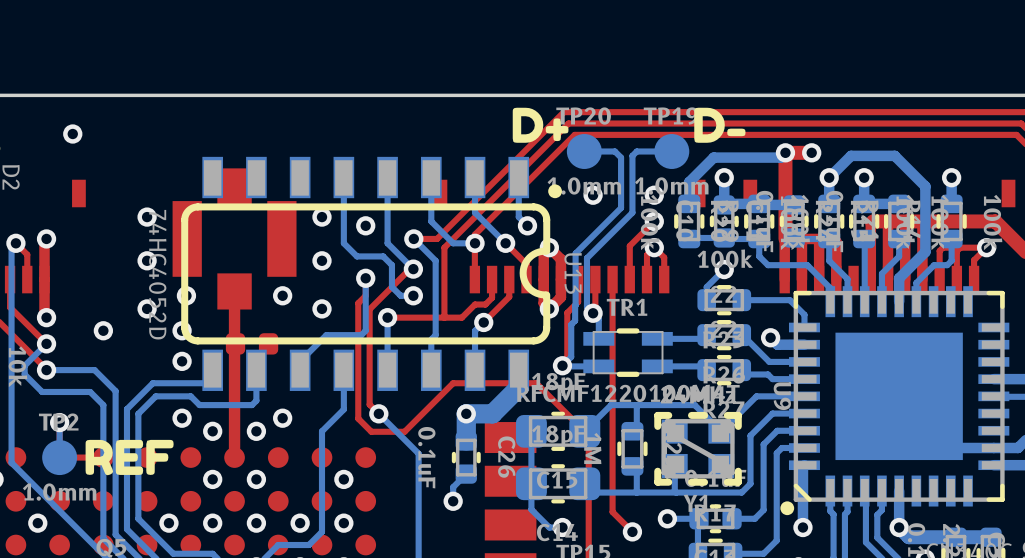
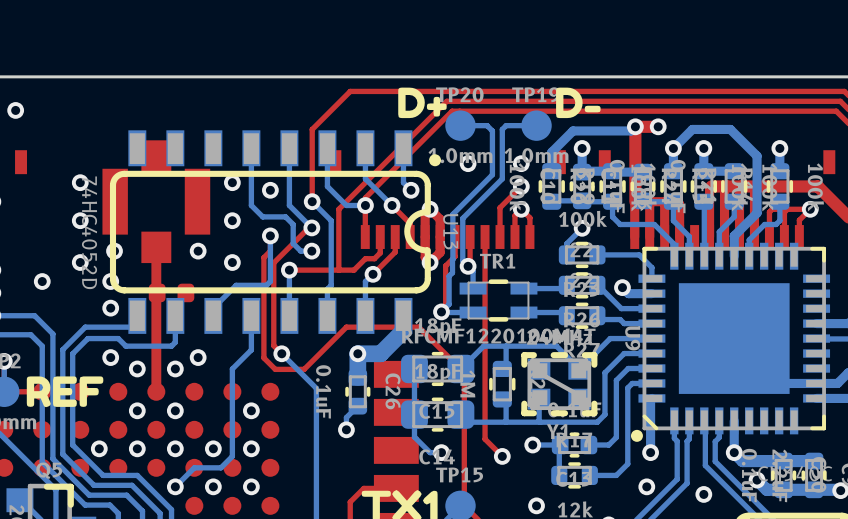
top track: (563, 112) (437, 238) (413, 238) -> (442, 91) (350, 91) (312, 129) (312, 201)

